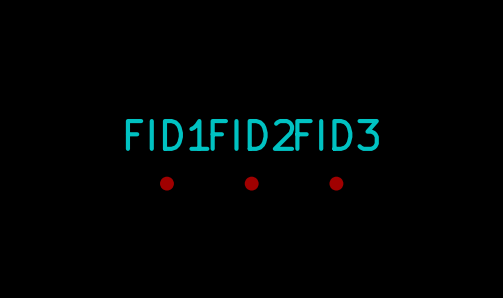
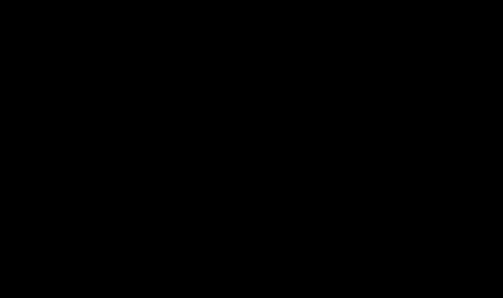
FID1: (166, 183) -> none
FID2: (251, 183) -> none
FID3: (336, 183) -> none

